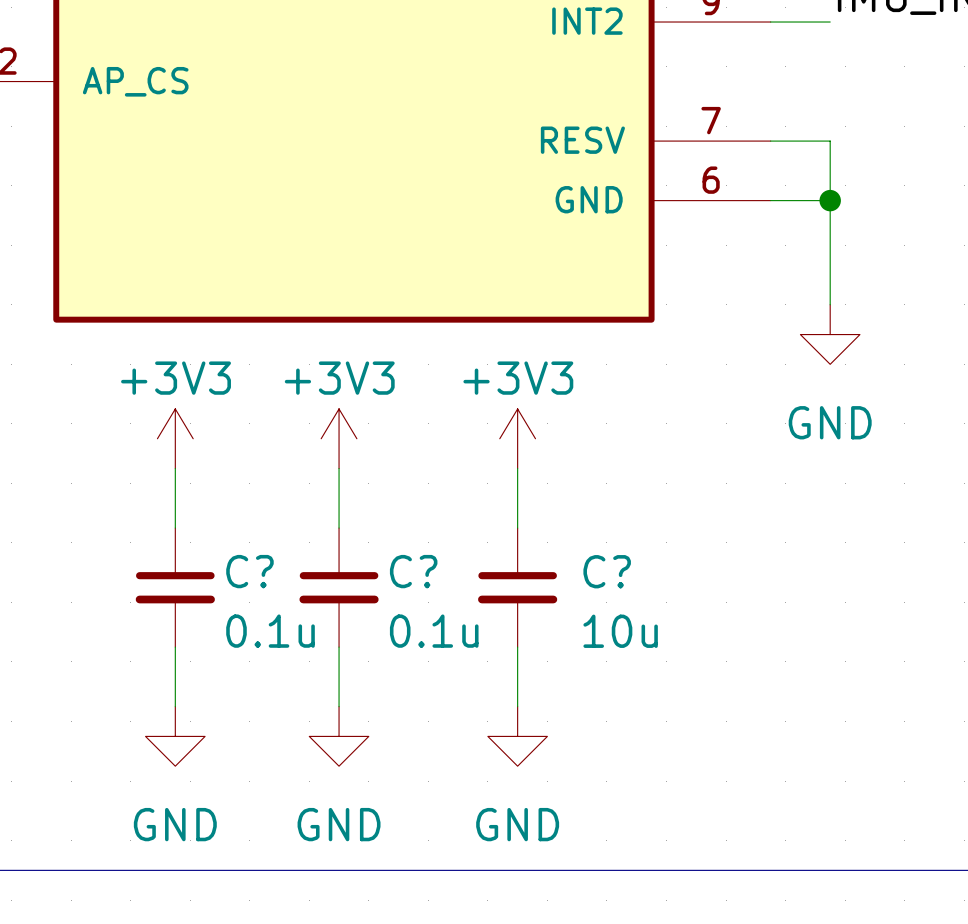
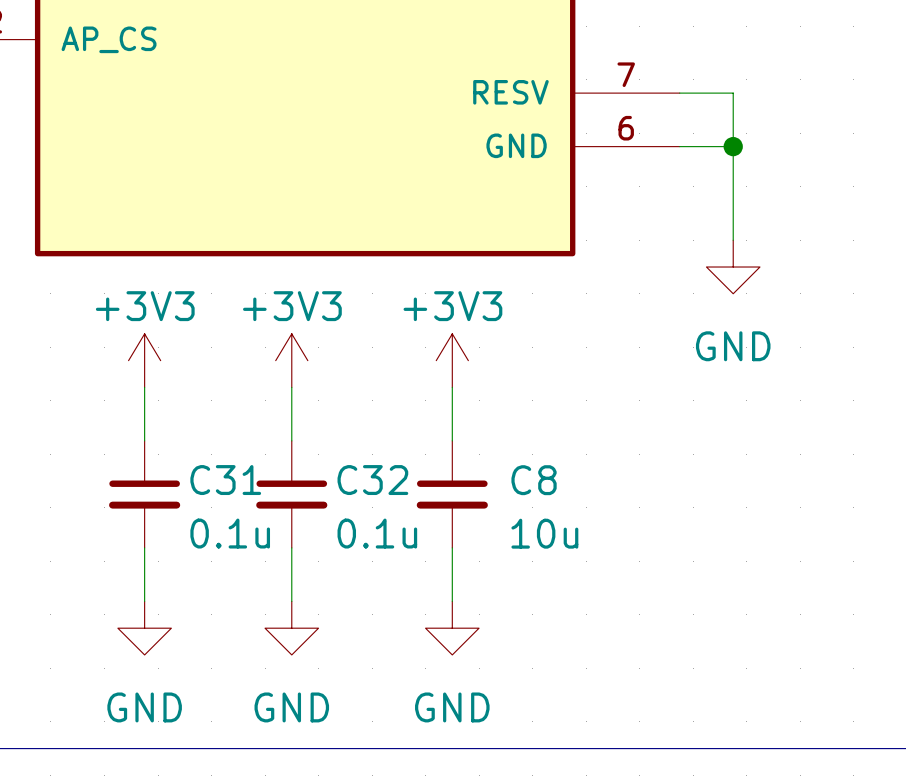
C? name: C? (249, 571) -> C31 (225, 480)
C? name: C? (413, 571) -> C32 (372, 480)
C? name: C? (607, 571) -> C8 (534, 480)

